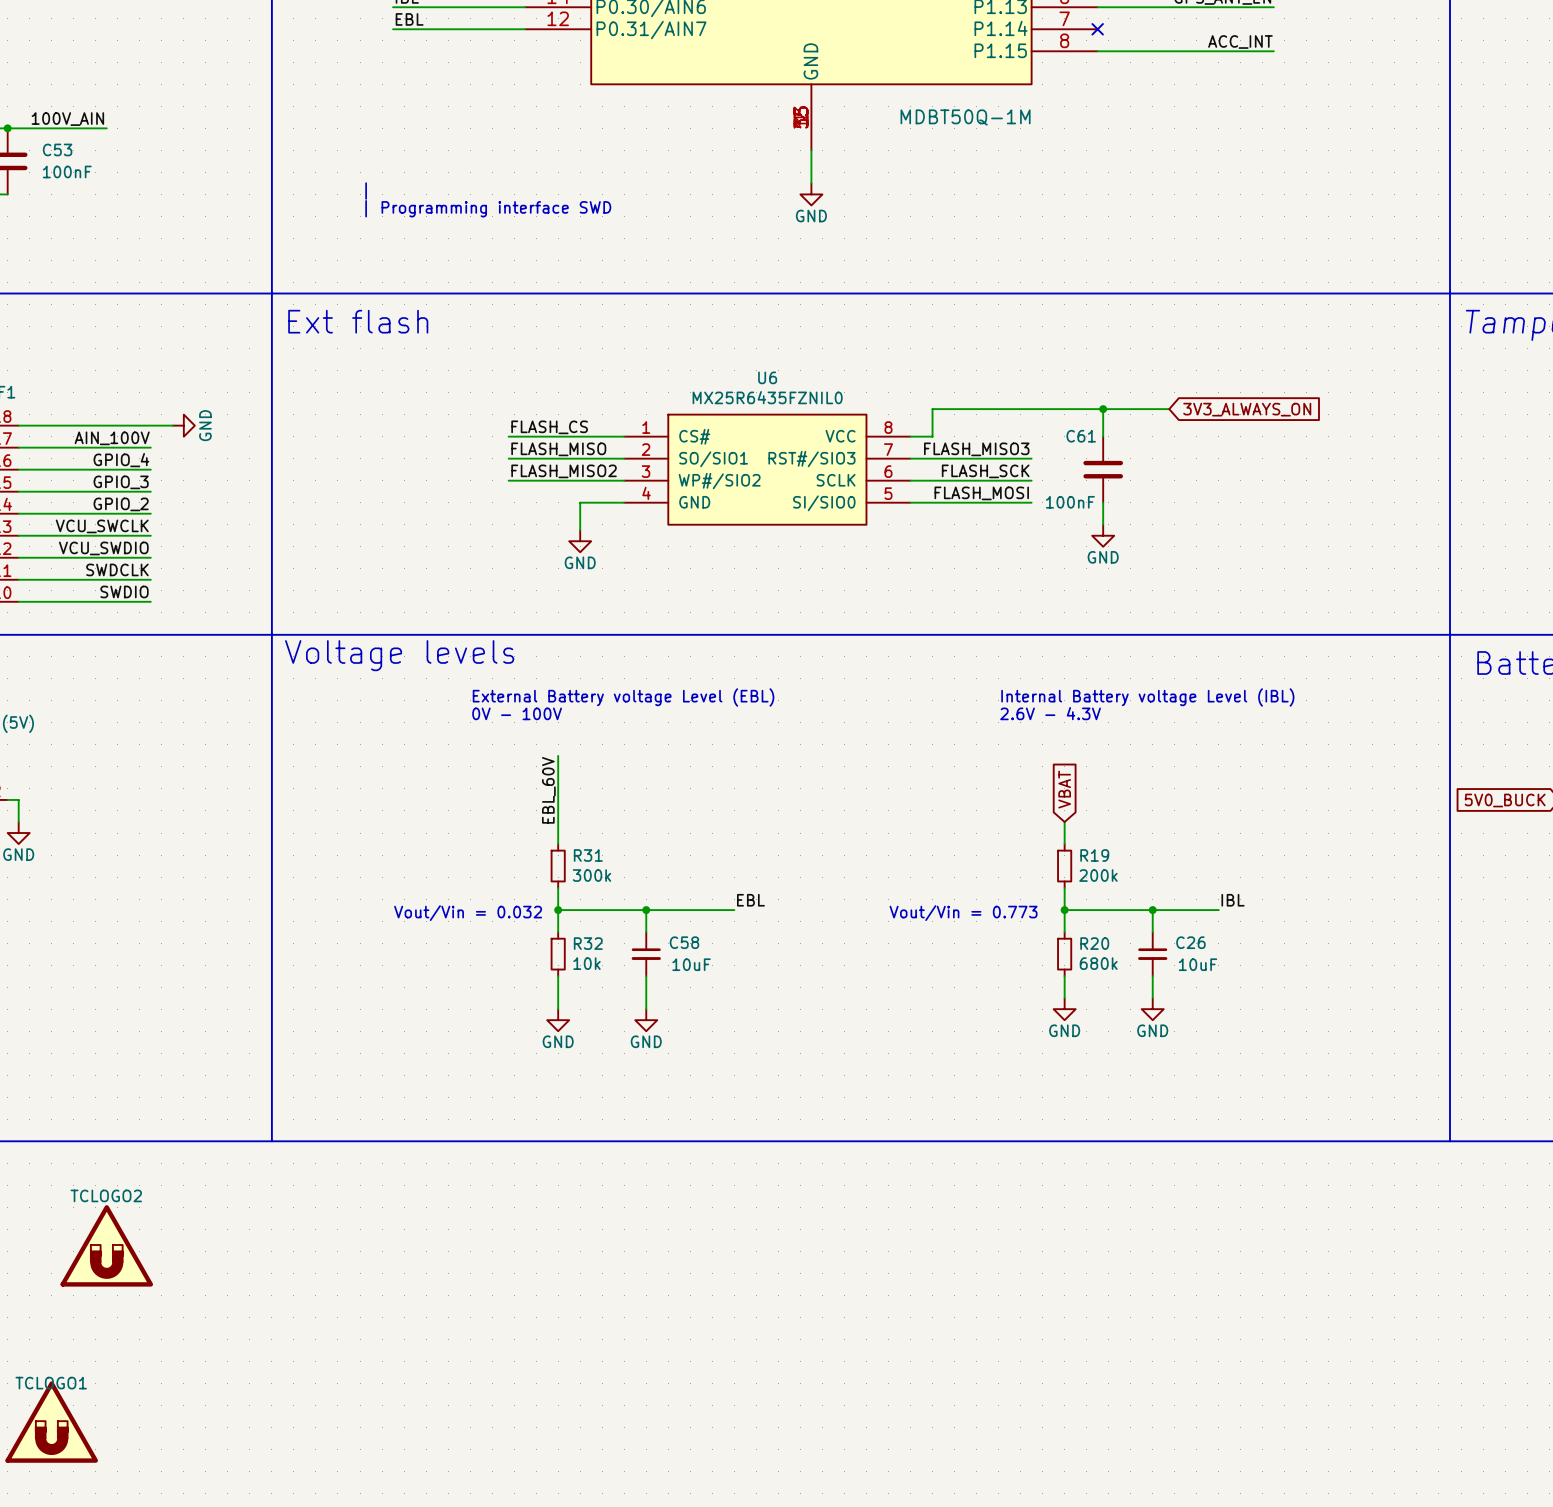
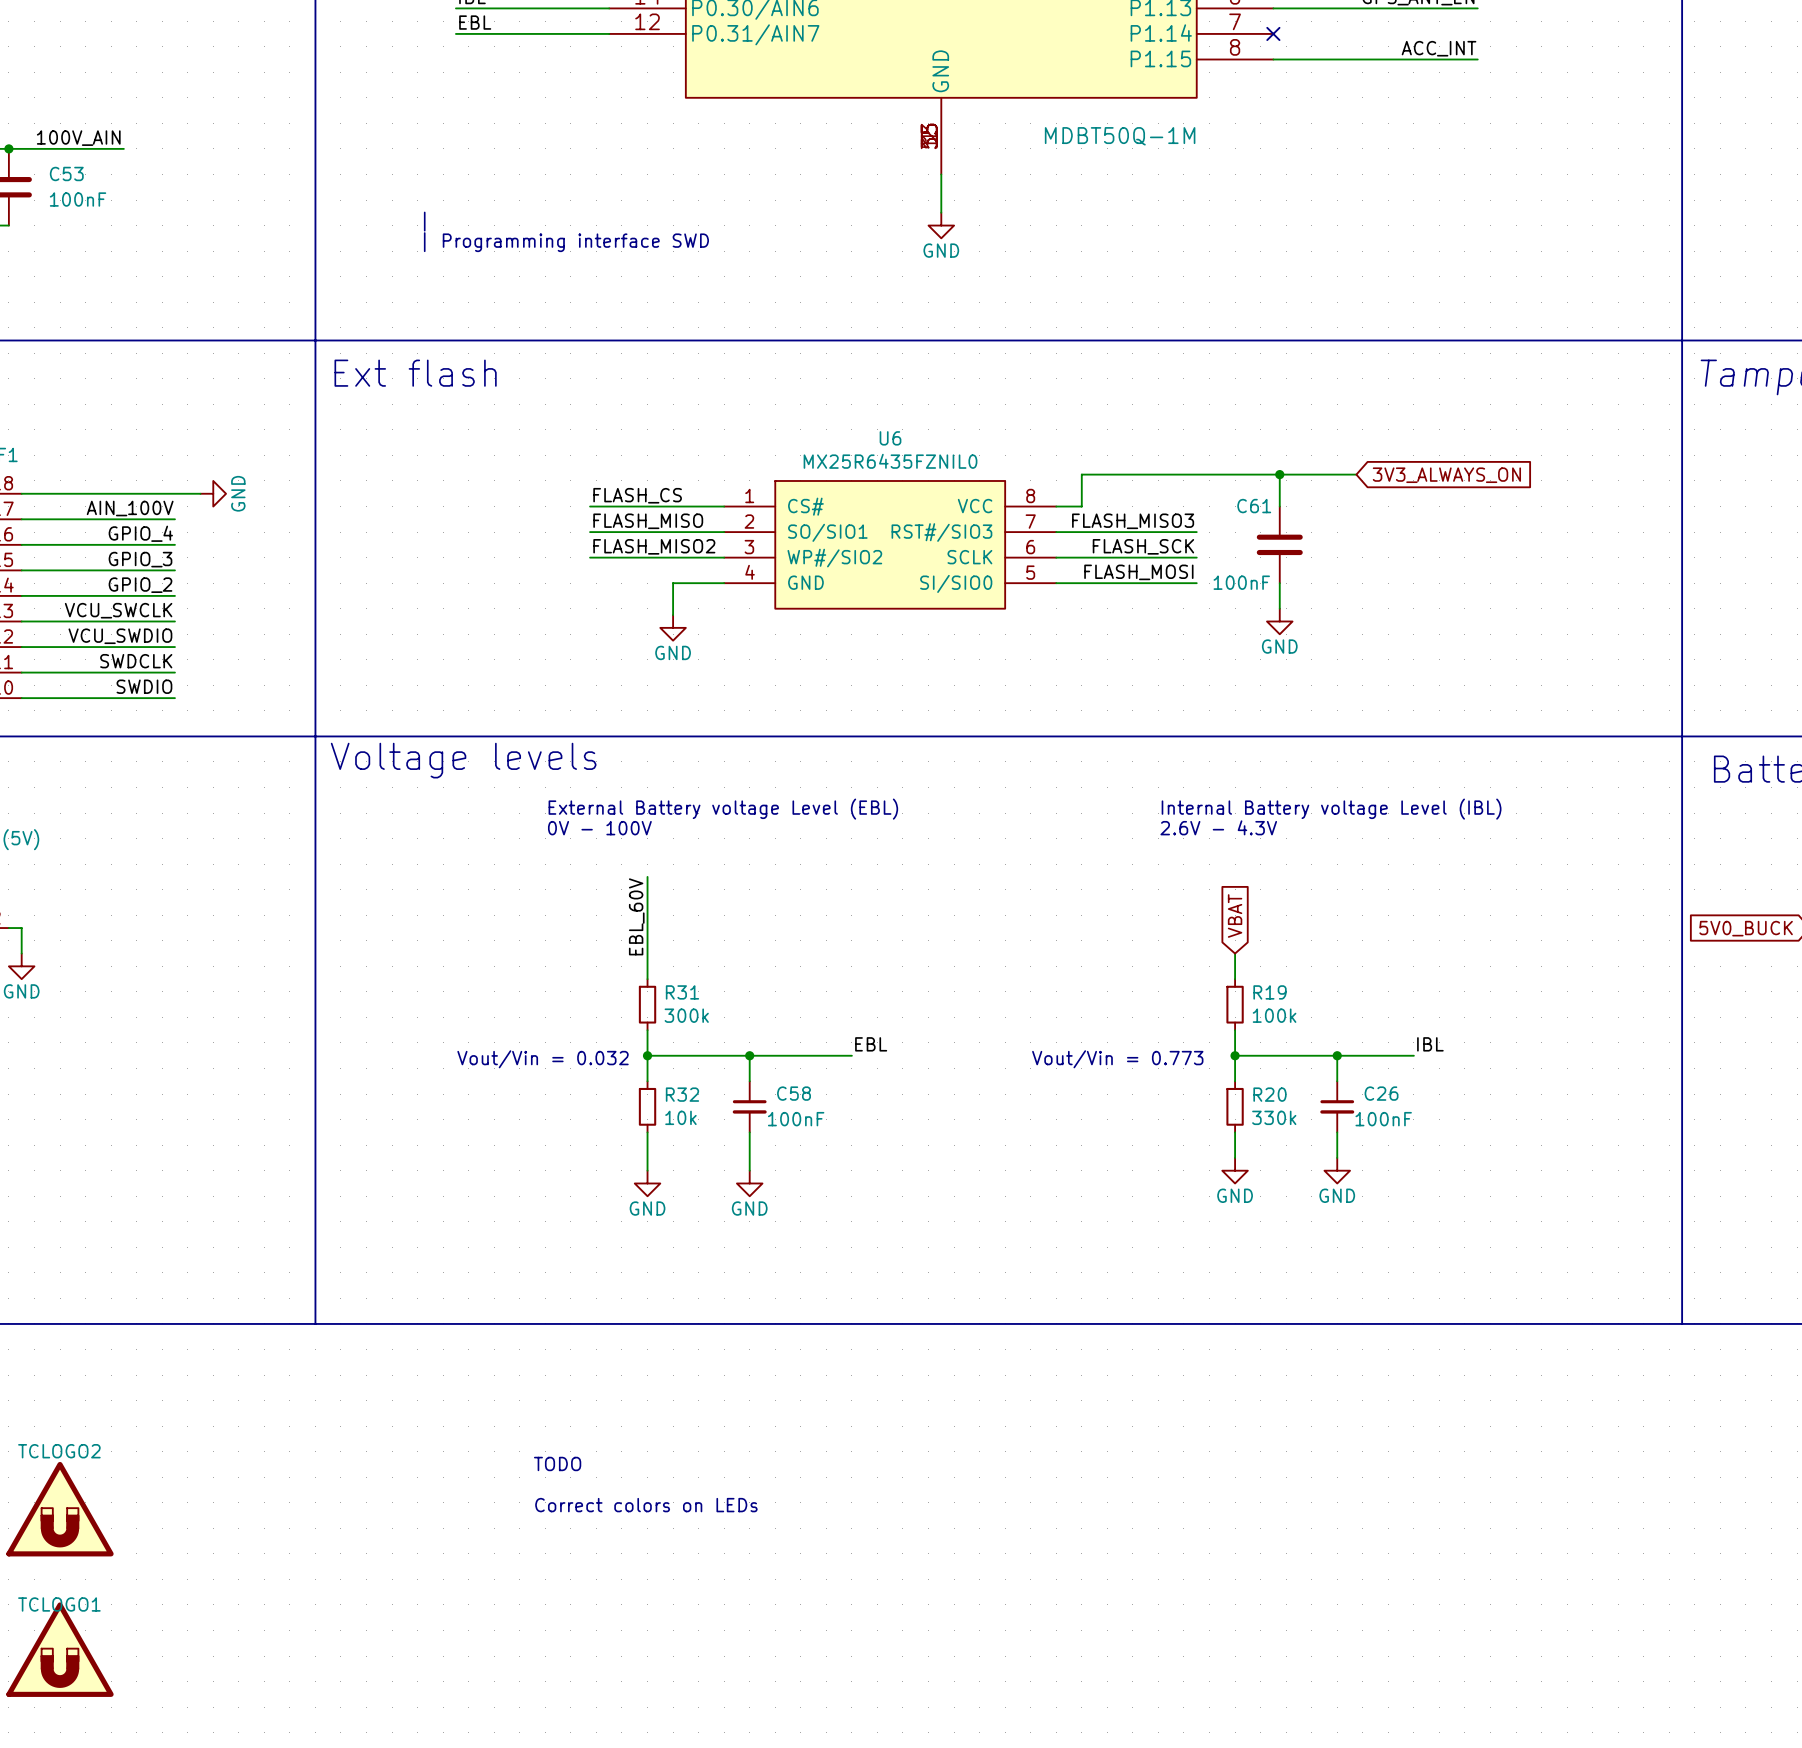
R19 value: 200k (1098, 875) -> 100k (1274, 1015)
R20 value: 680k (1098, 963) -> 330k (1274, 1117)
C58 value: 10uF (691, 964) -> 100nF (796, 1119)
C26 value: 10uF (1197, 964) -> 100nF (1383, 1119)
TCLOGO2 position: (106, 1245) -> (60, 1509)
text: none -> TODO (557, 1463)
text: none -> Correct colors on LEDs (646, 1505)

